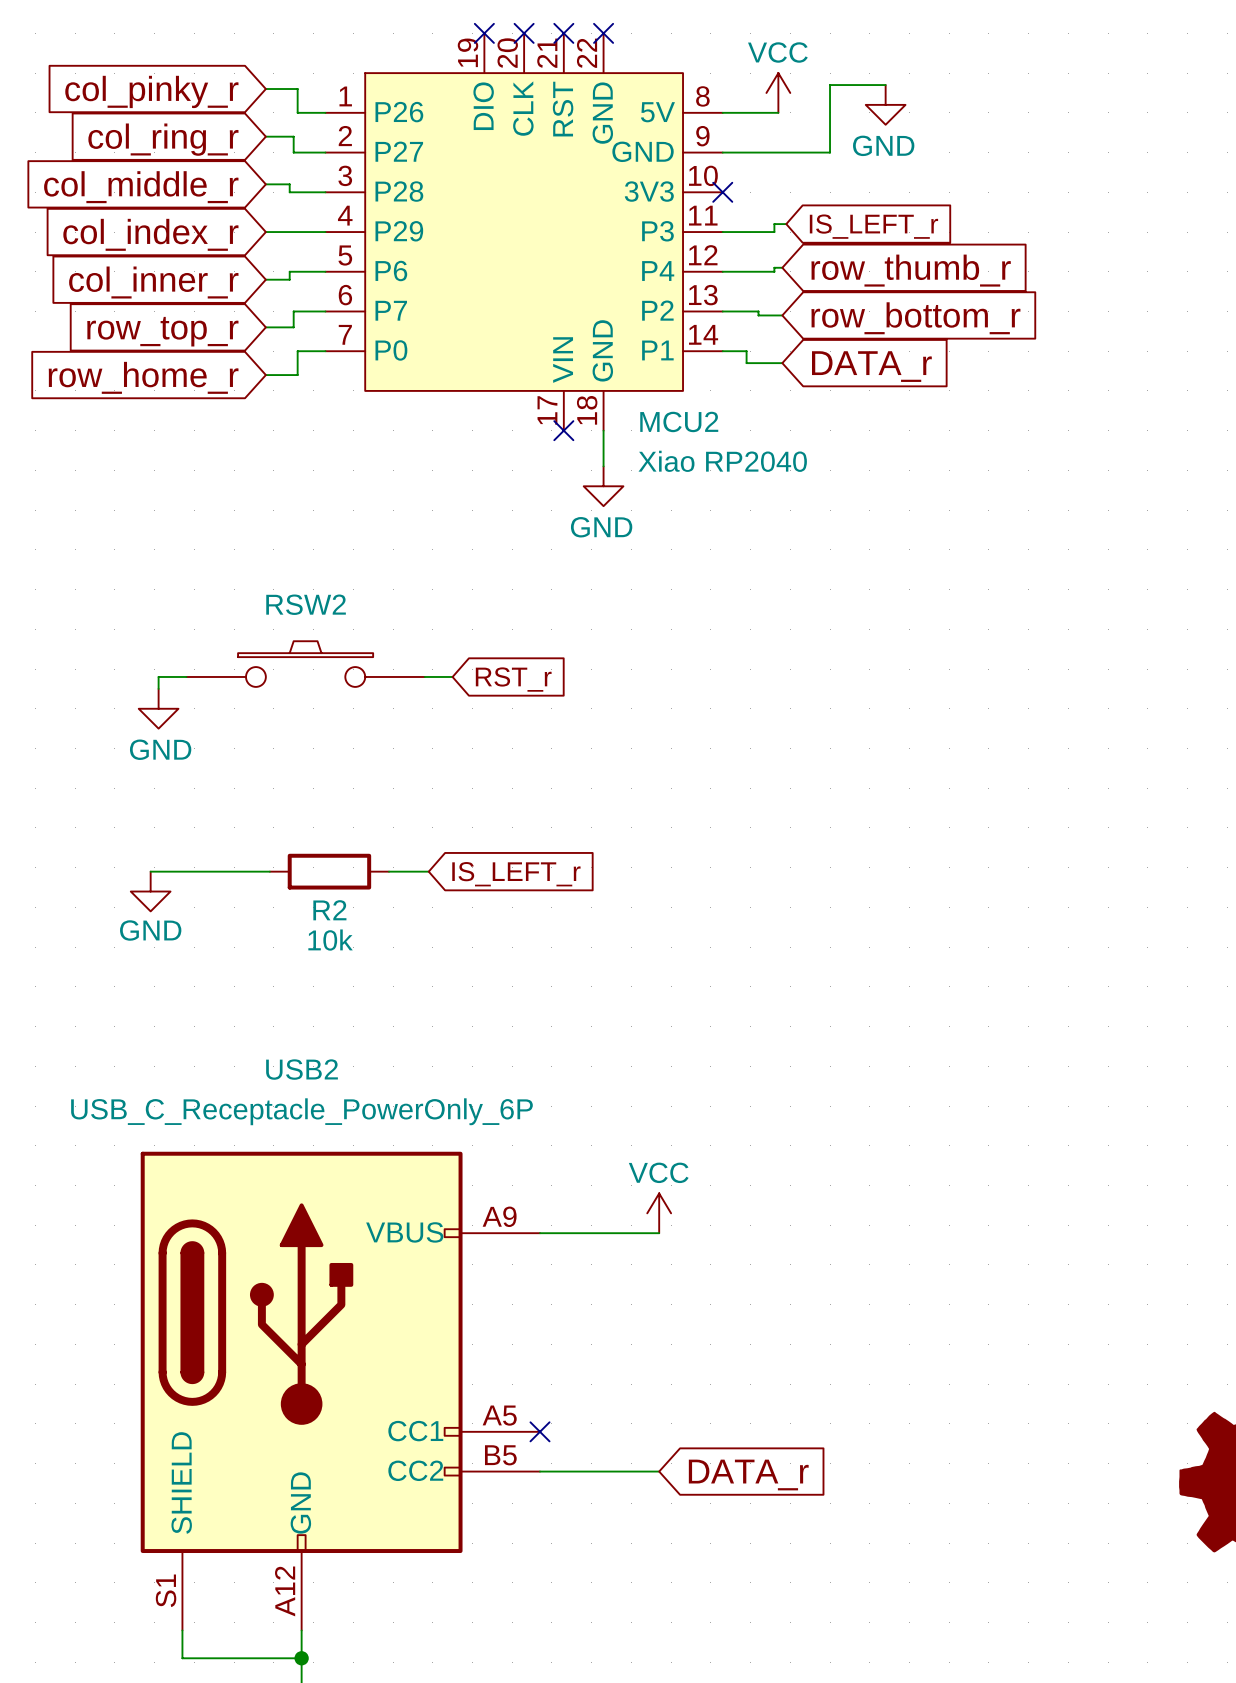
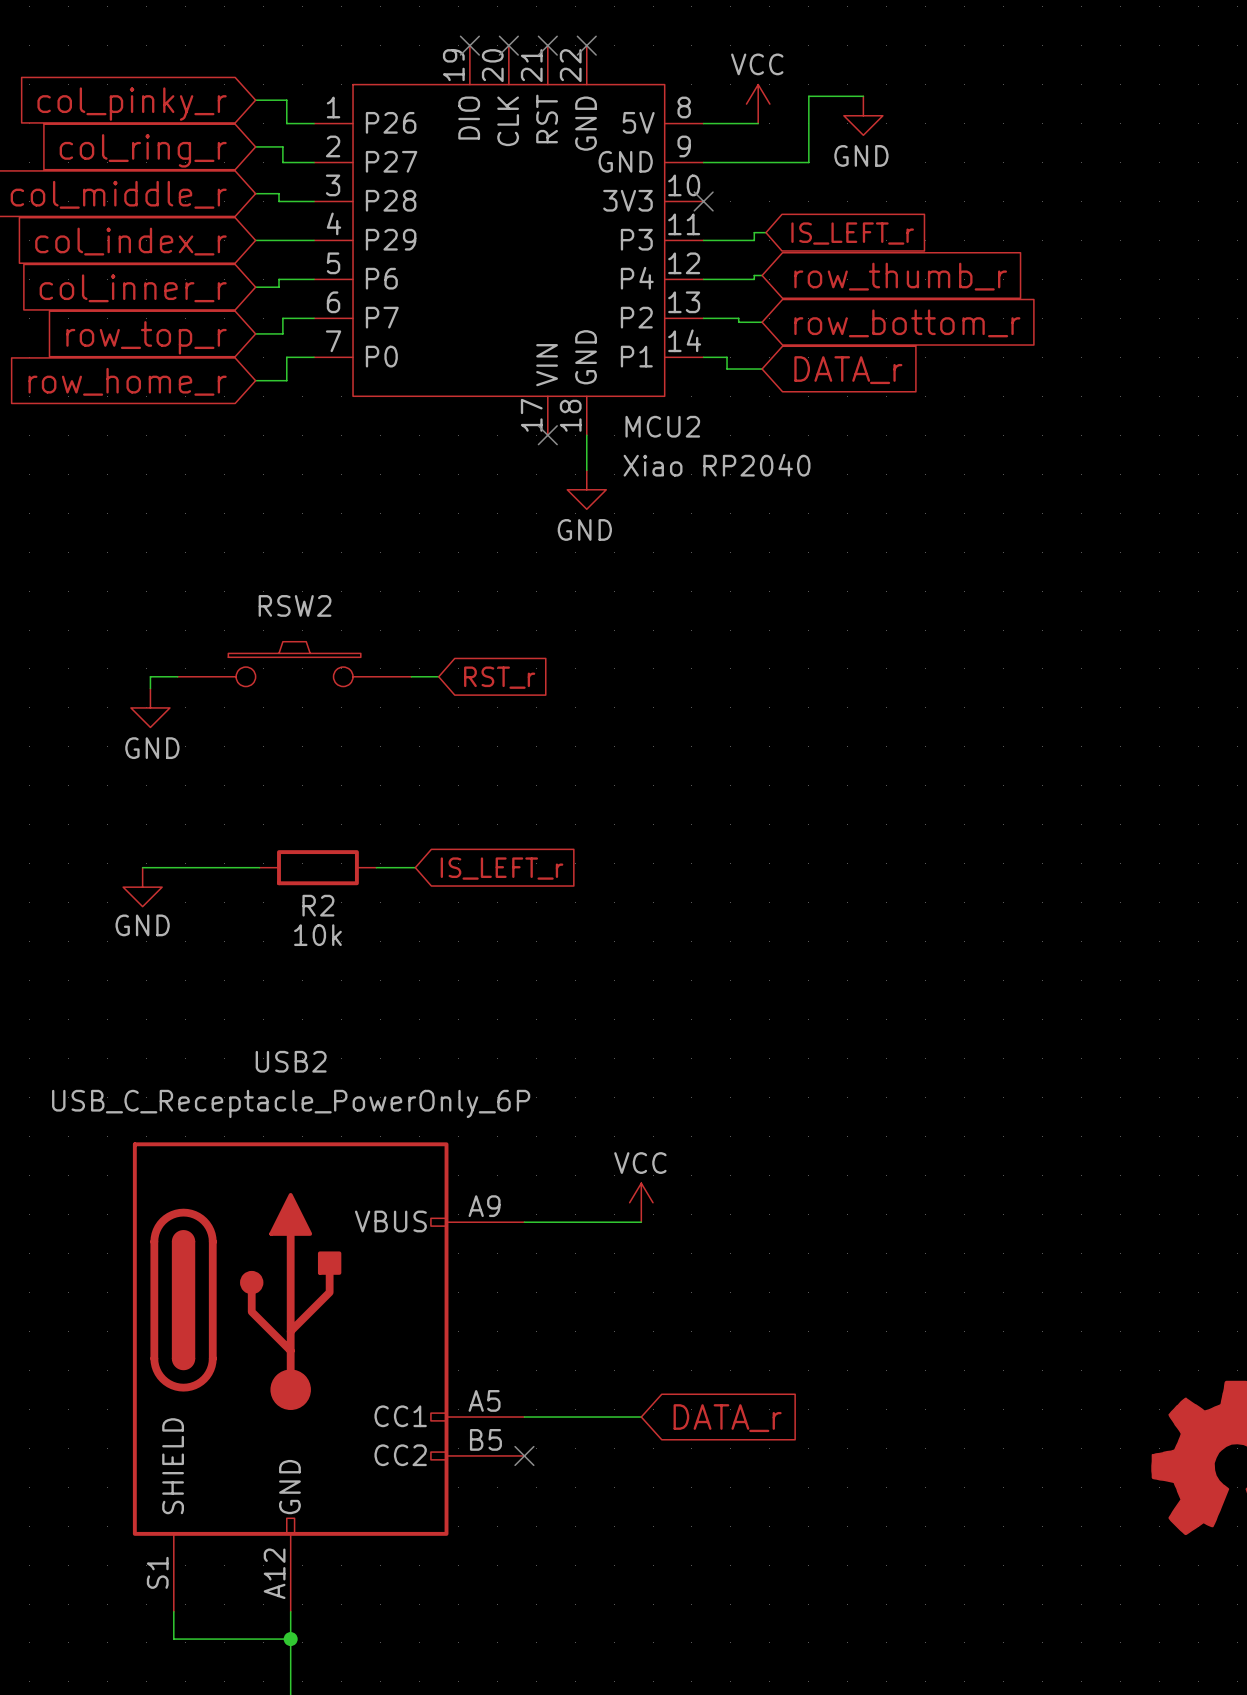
no-connect mark position: (540, 1431) -> (524, 1455)
wire: (540, 1471) (659, 1471) -> (524, 1417) (641, 1417)
global label position: DATA_r (748, 1475) -> DATA_r (727, 1418)

